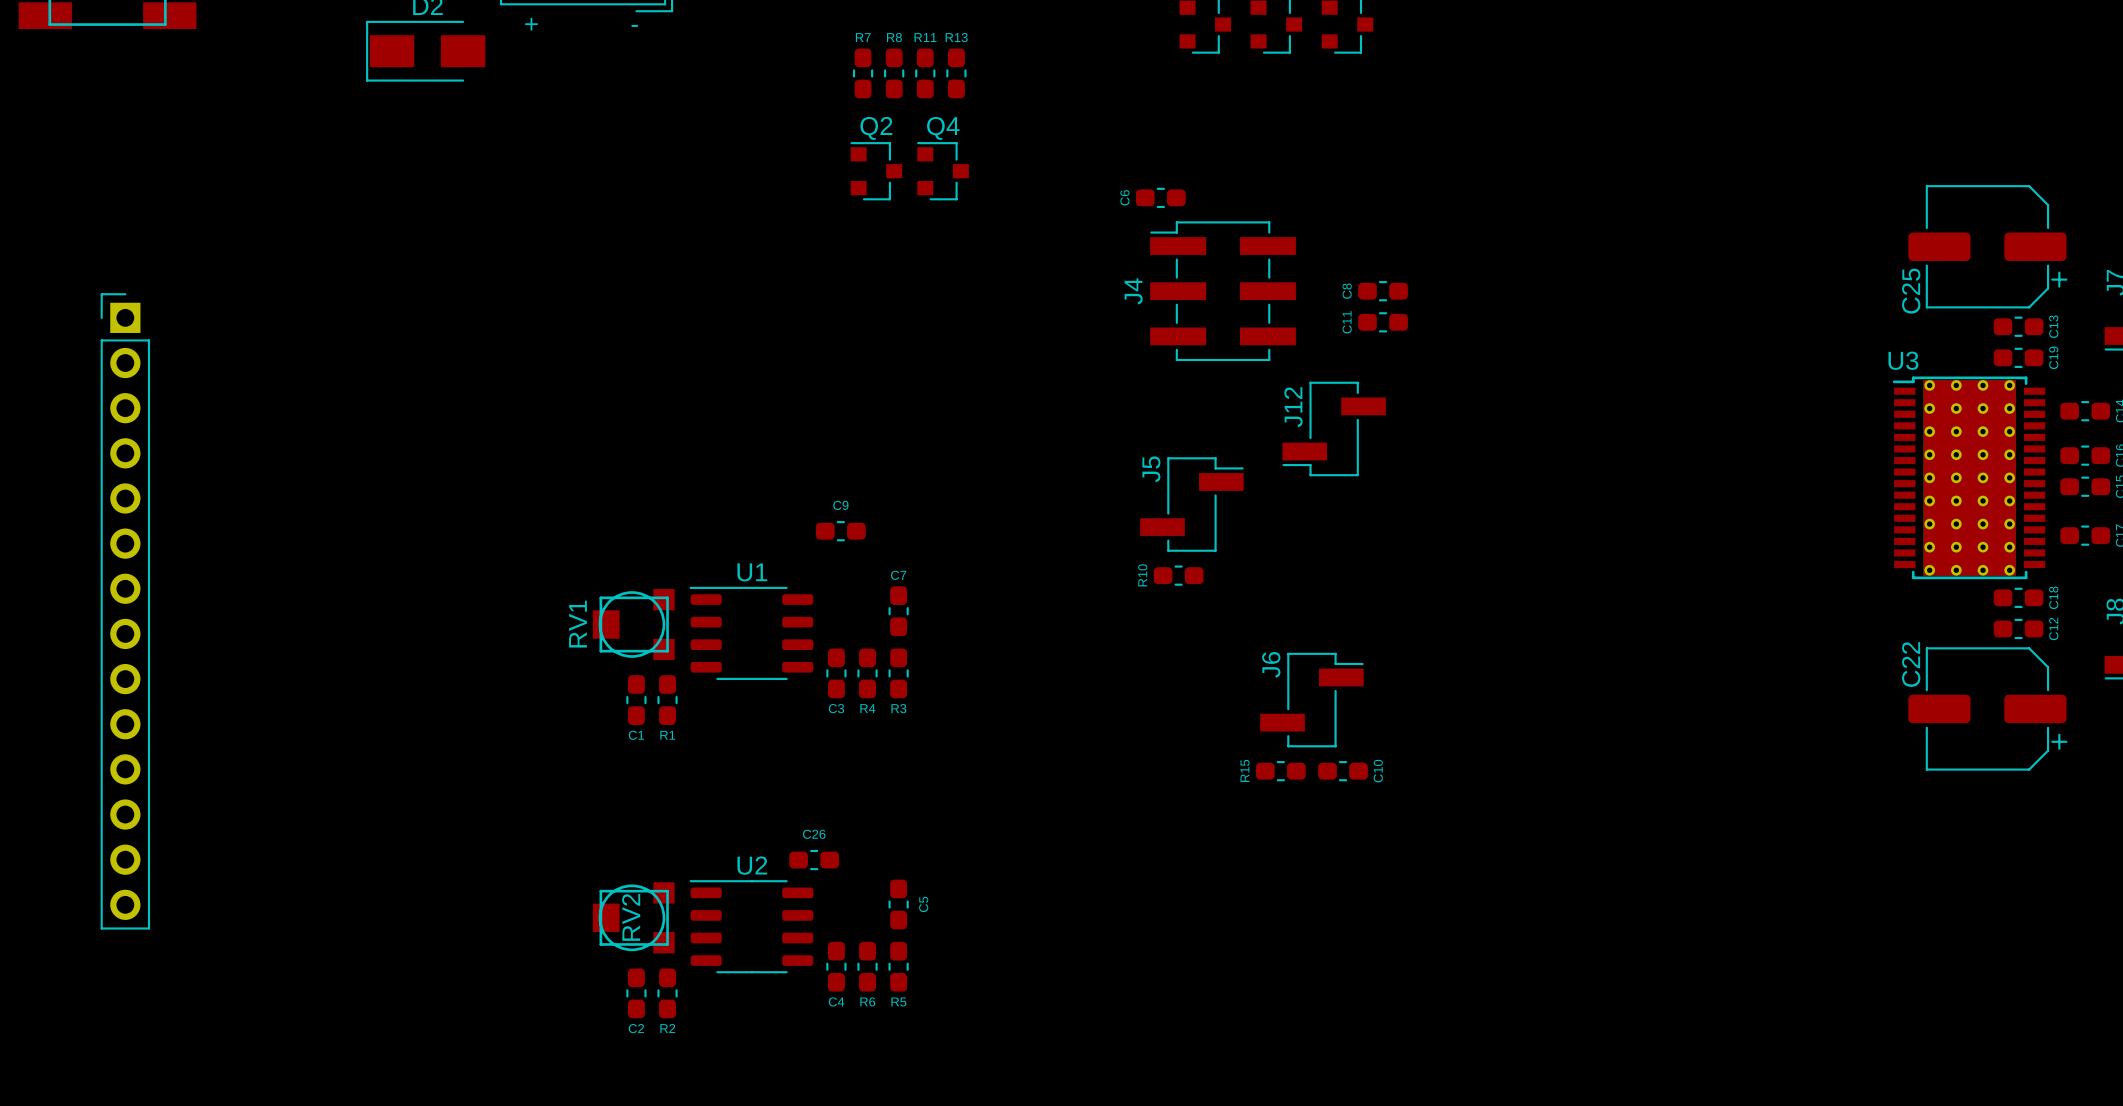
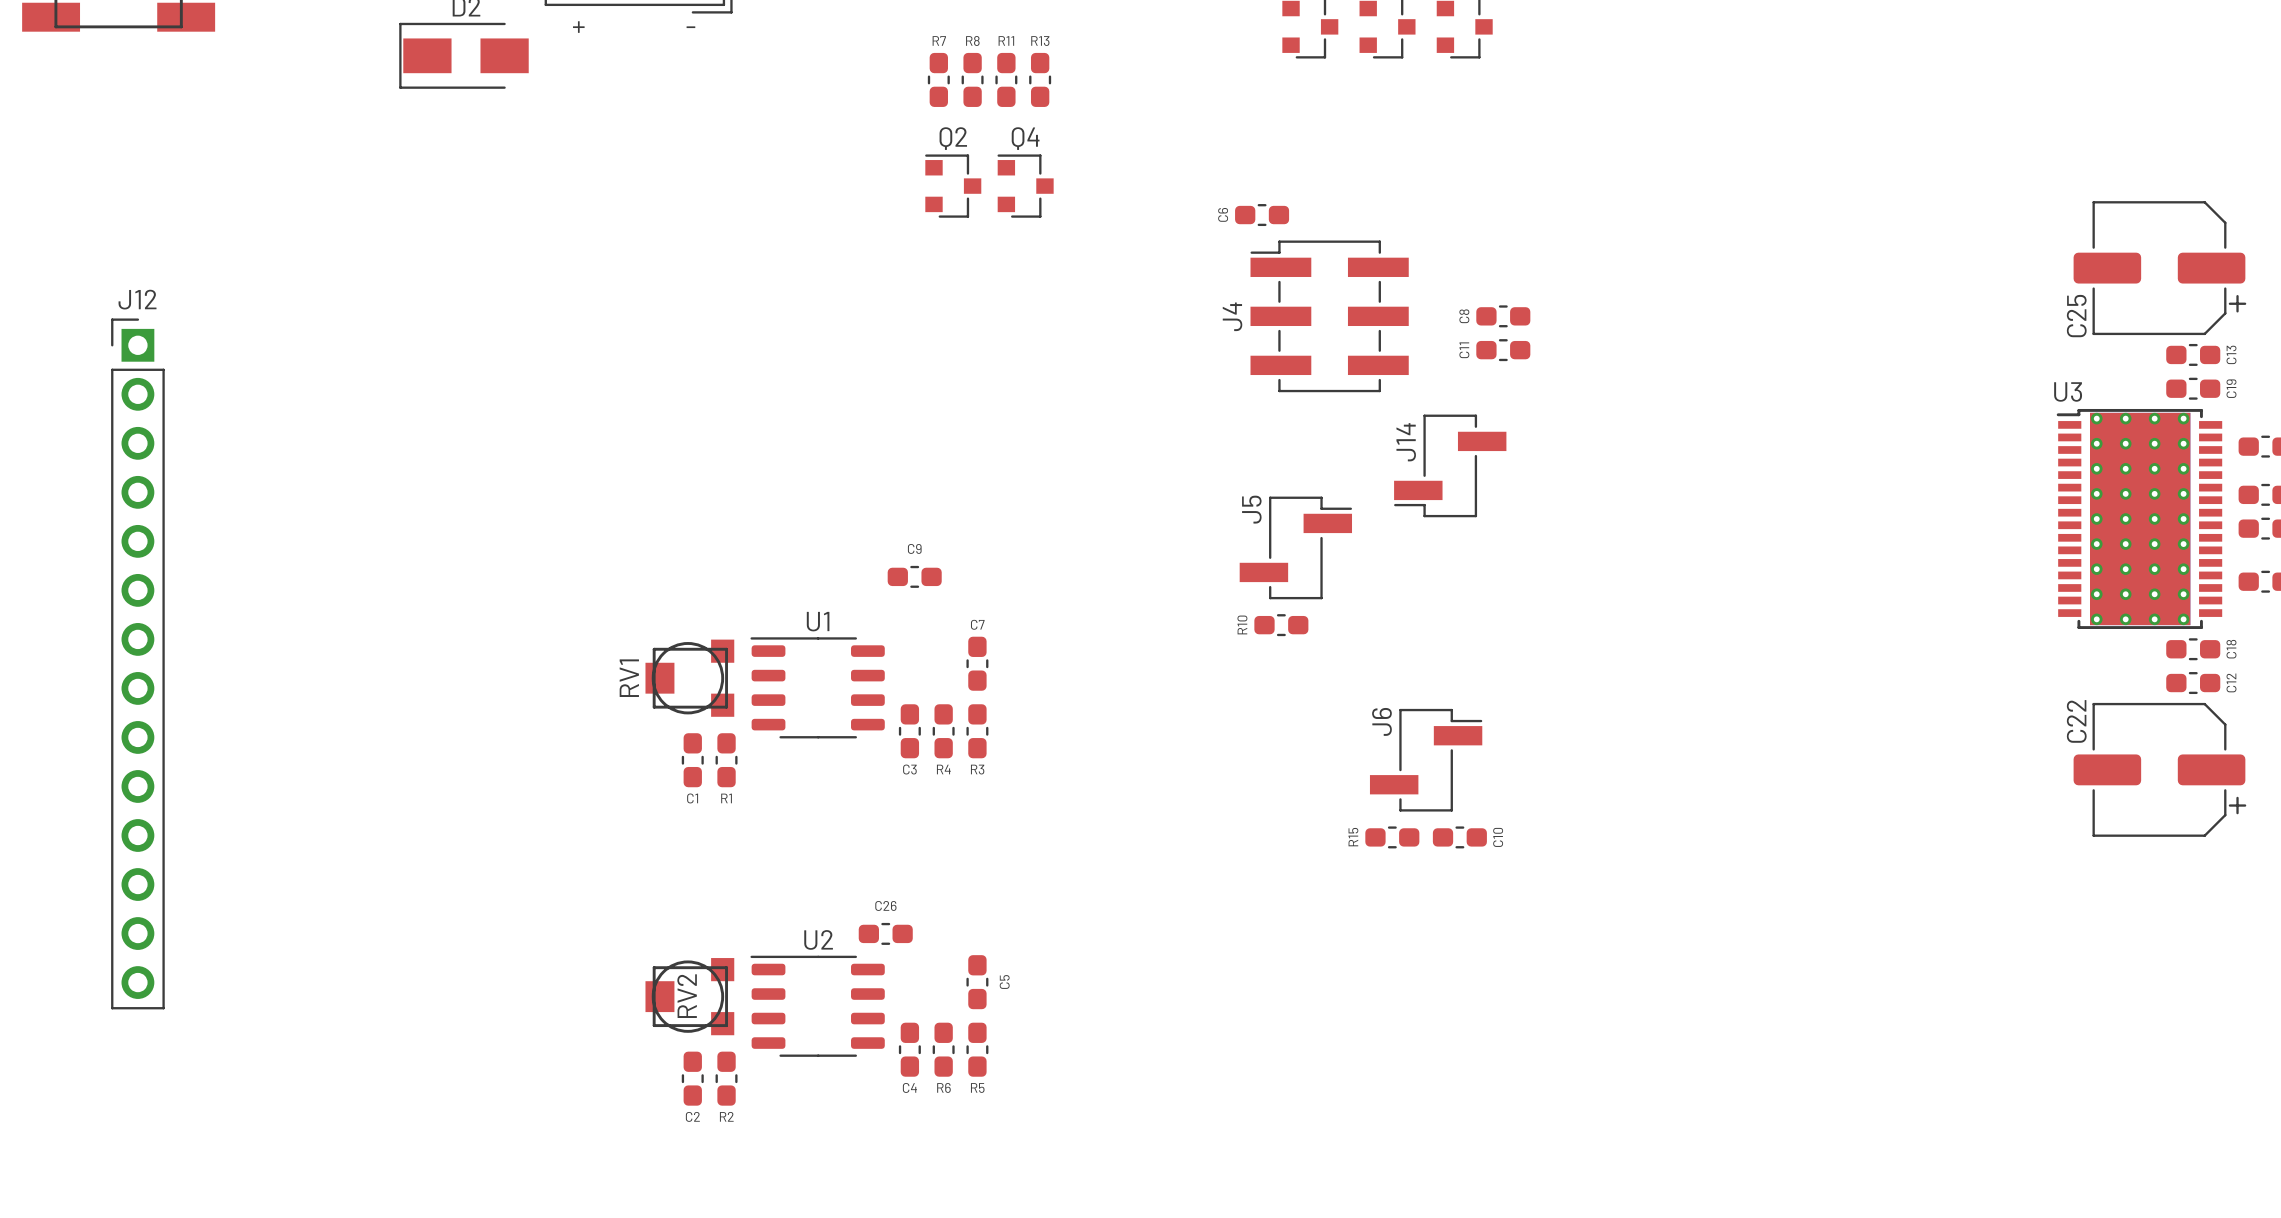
J12 name: none -> J12 (137, 299)
J12 name: J12 (1293, 407) -> J14 (1406, 442)

